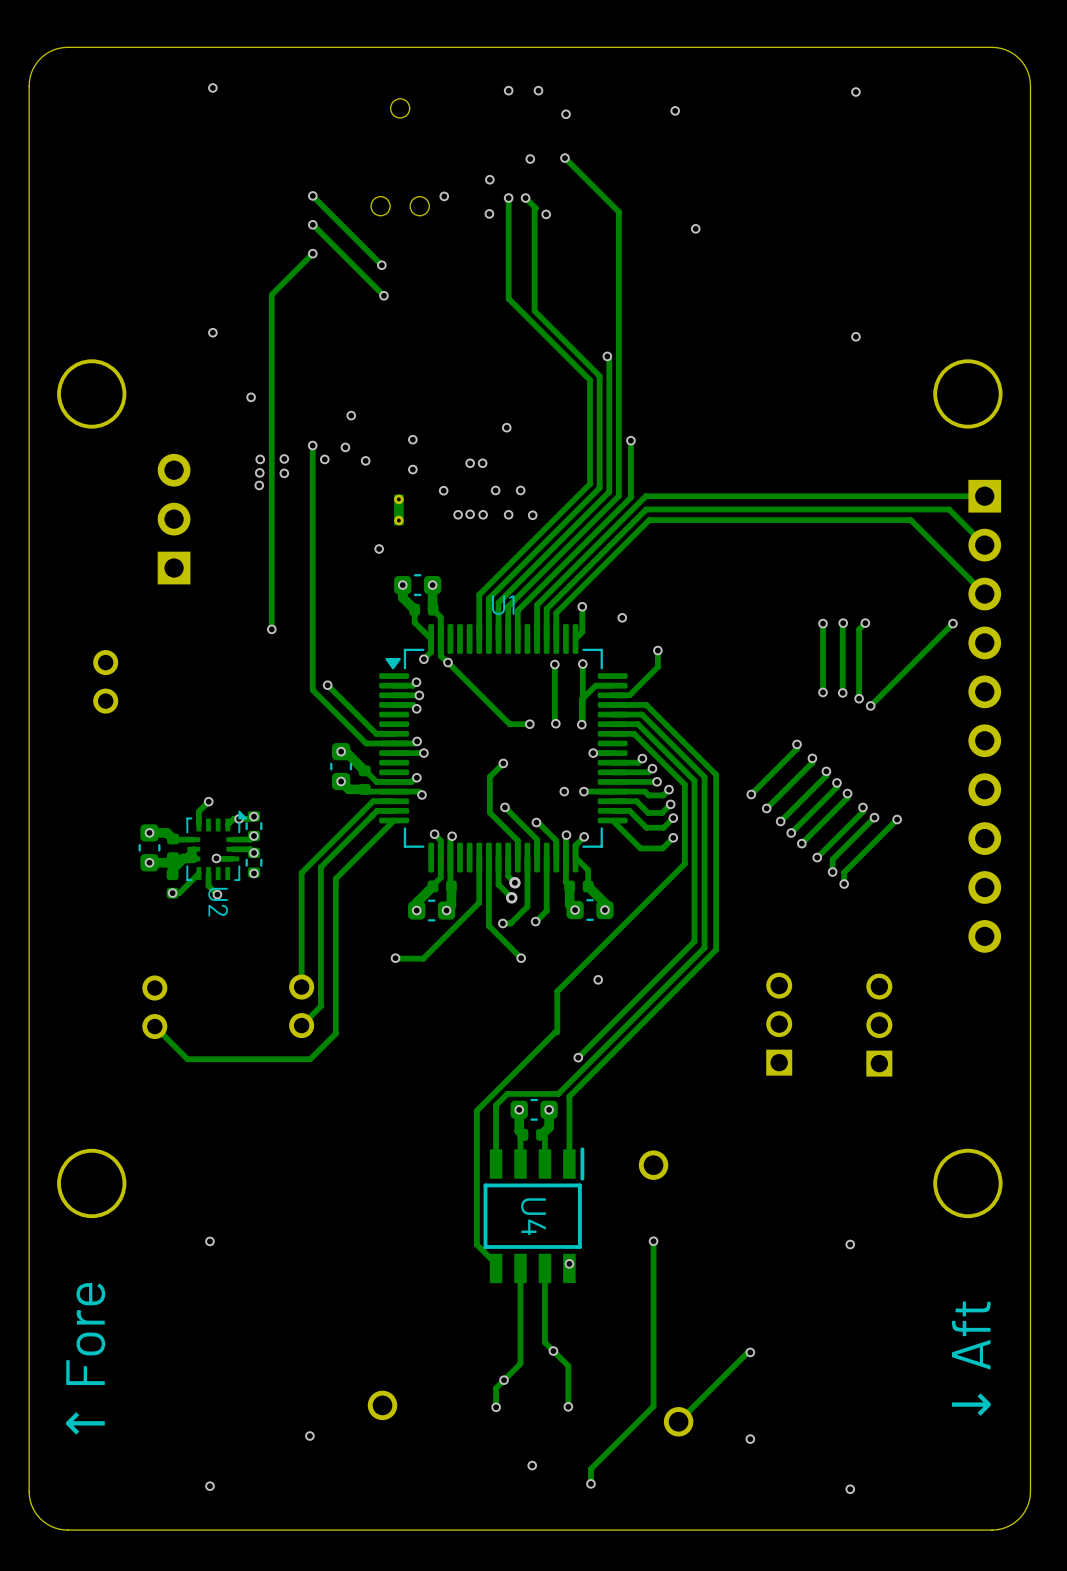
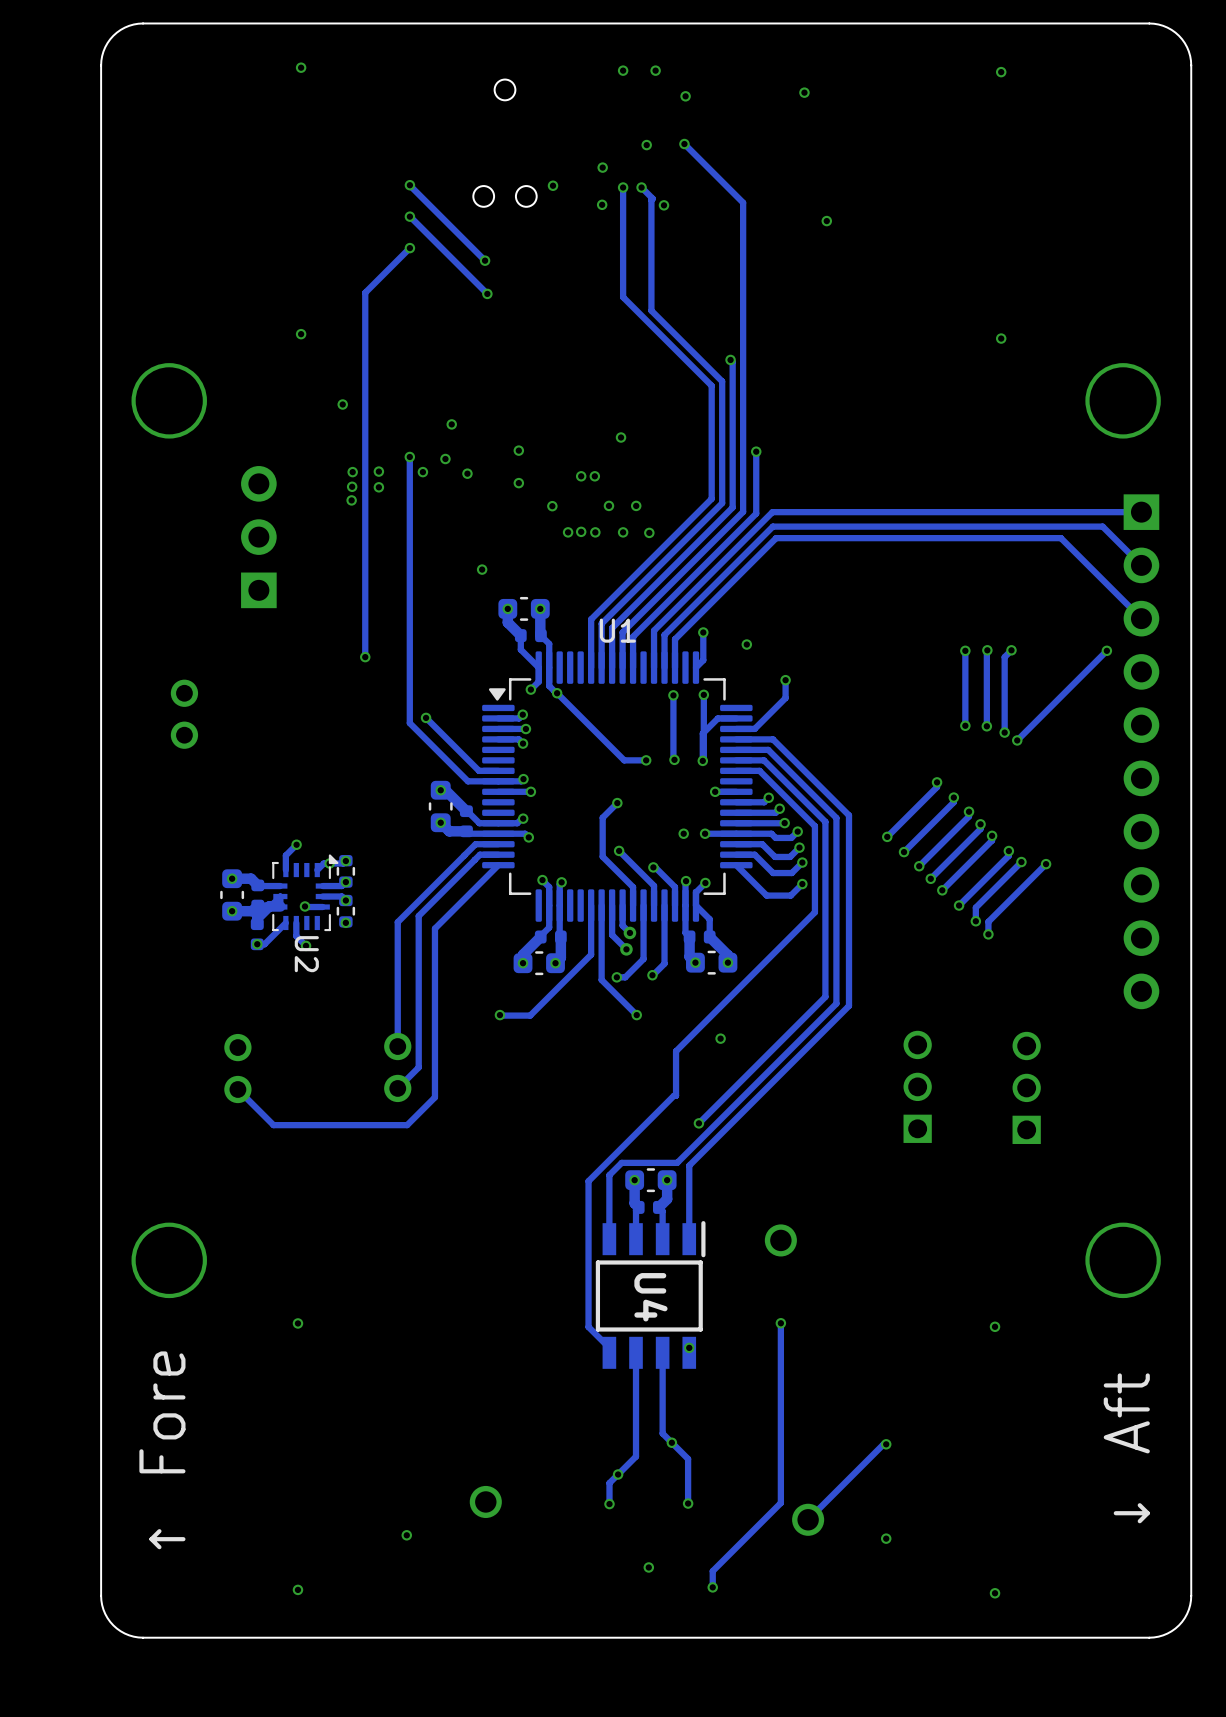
part: (398, 509) -> none

